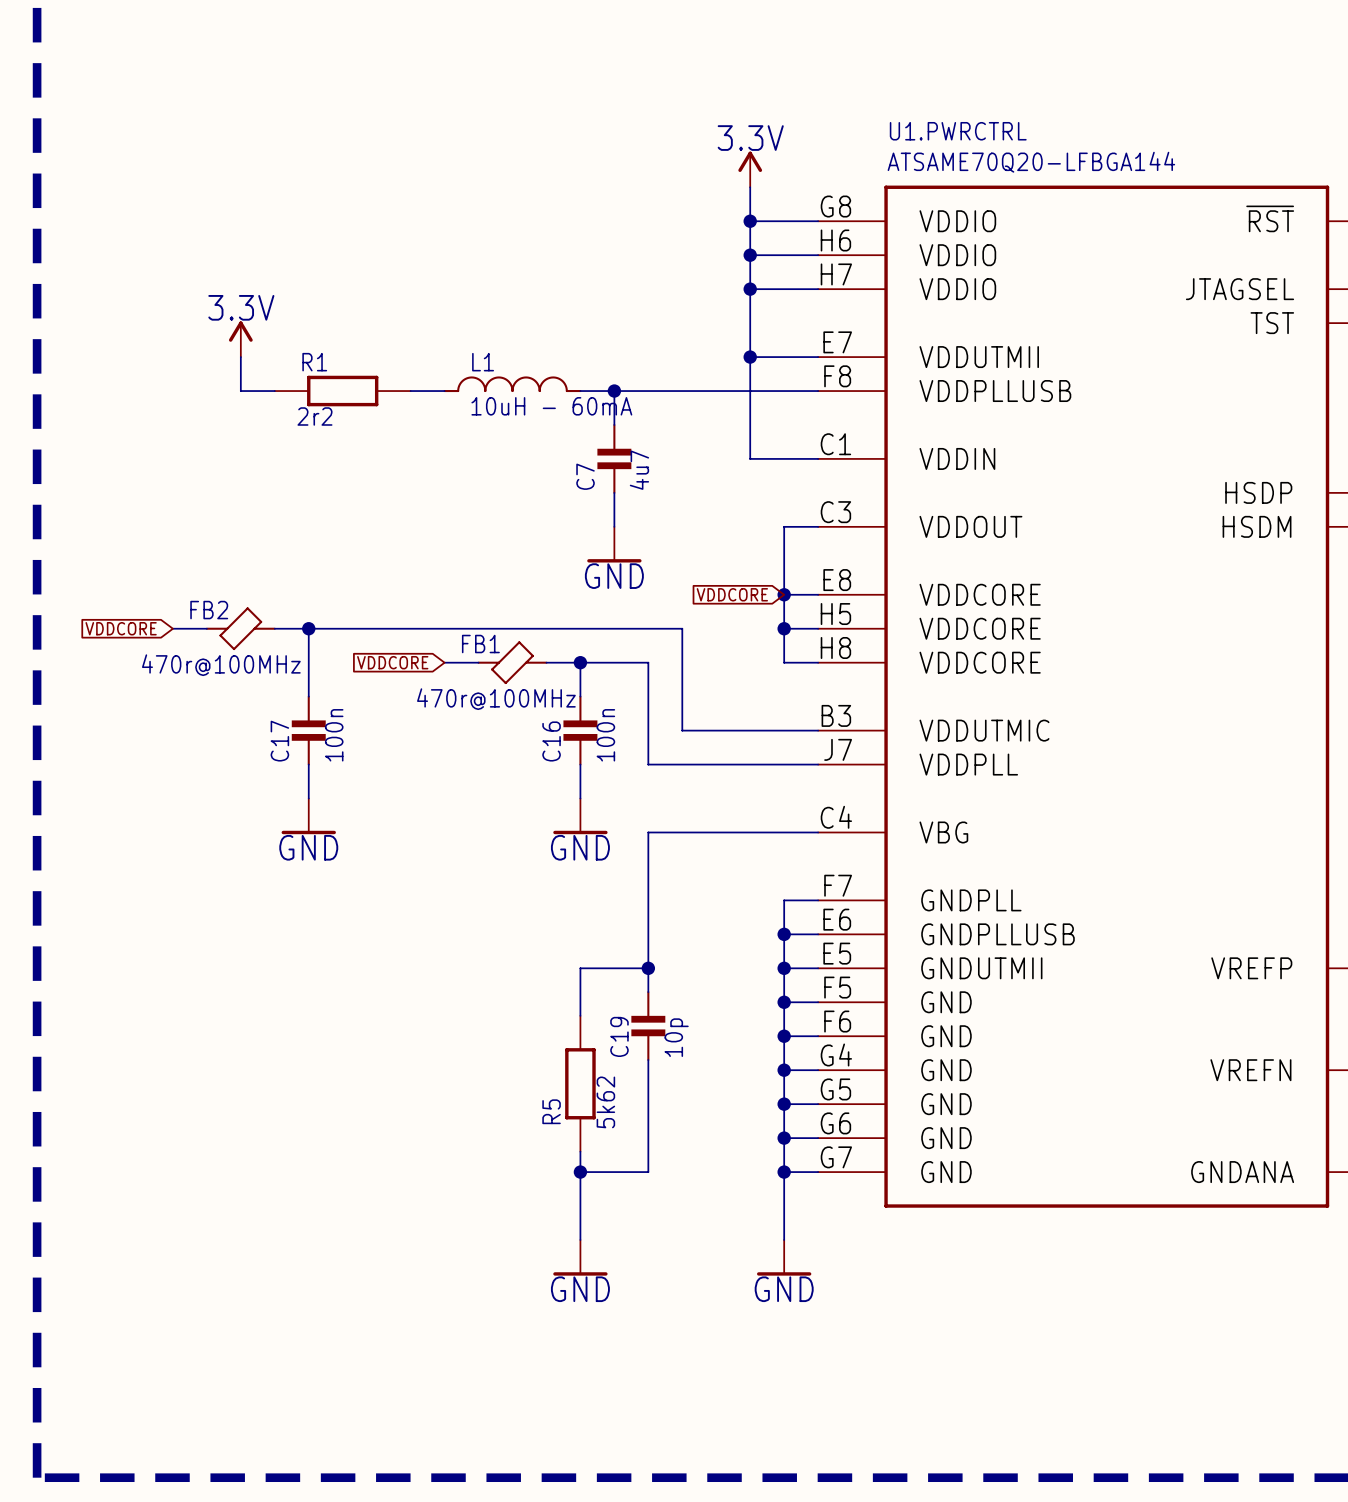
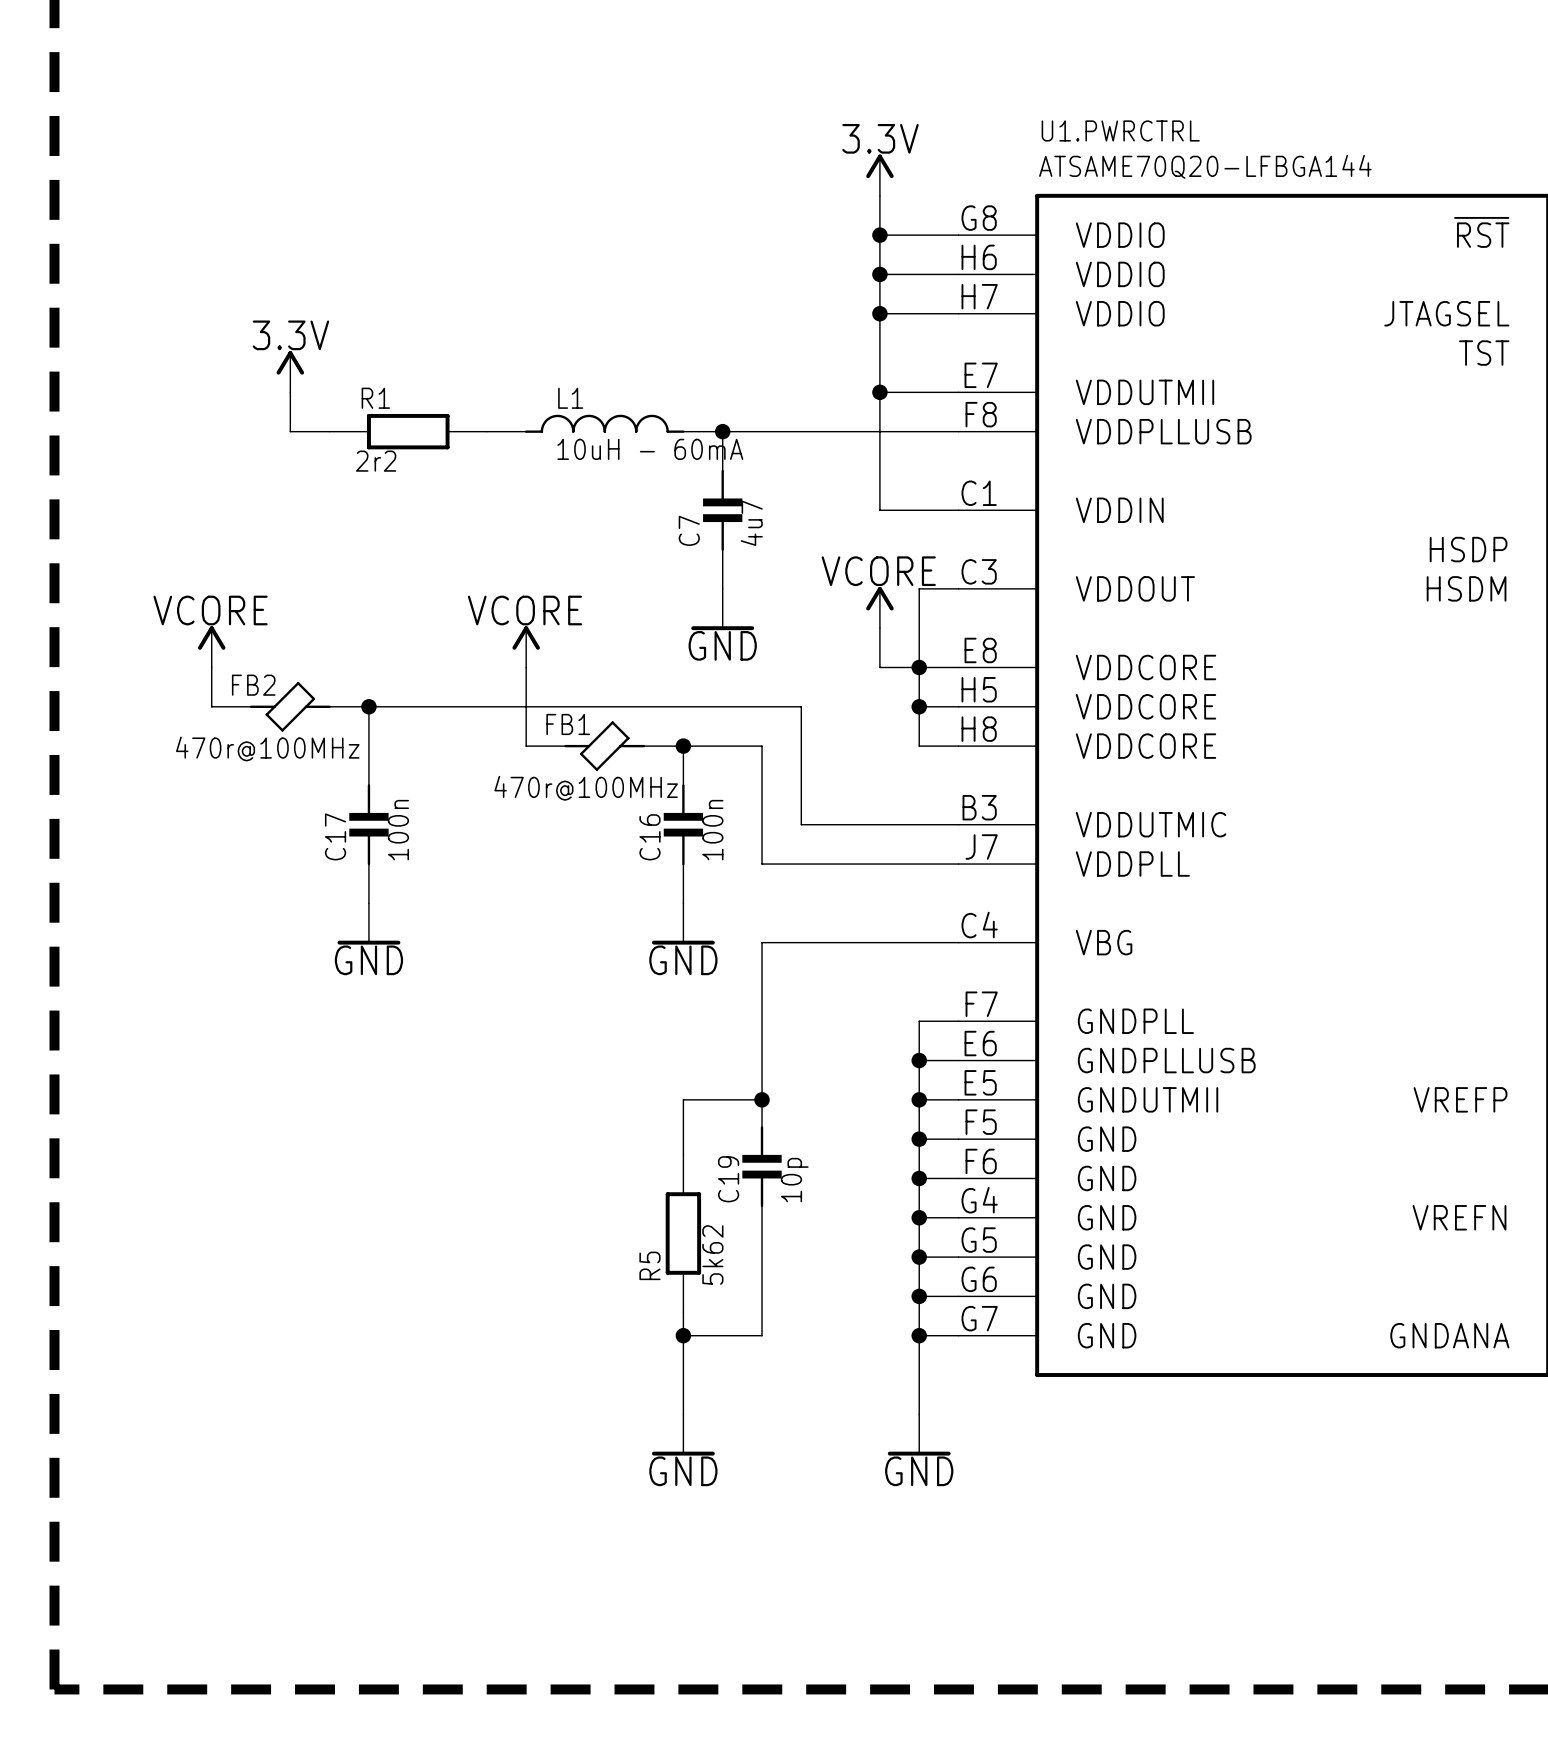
power symbol: none -> VCORE (879, 607)
wire: none -> (879, 628) (879, 667) (919, 667)
power symbol: none -> VCORE (211, 646)
power symbol: none -> VCORE (526, 646)
wire: none -> (211, 667) (211, 706)
wire: none -> (526, 667) (526, 746)
global label: VDDCORE (732, 594) -> none
global label: VDDCORE (121, 628) -> none
global label: VDDCORE (392, 662) -> none

